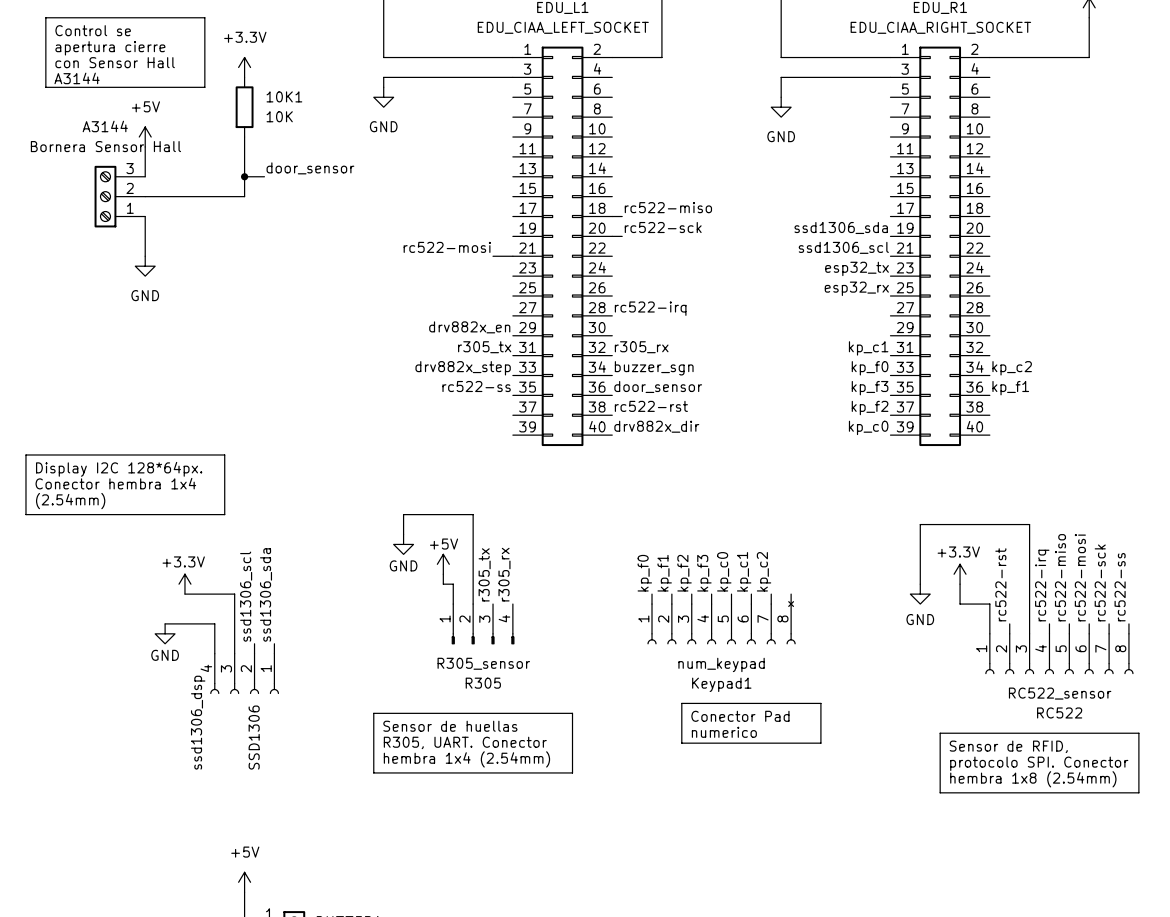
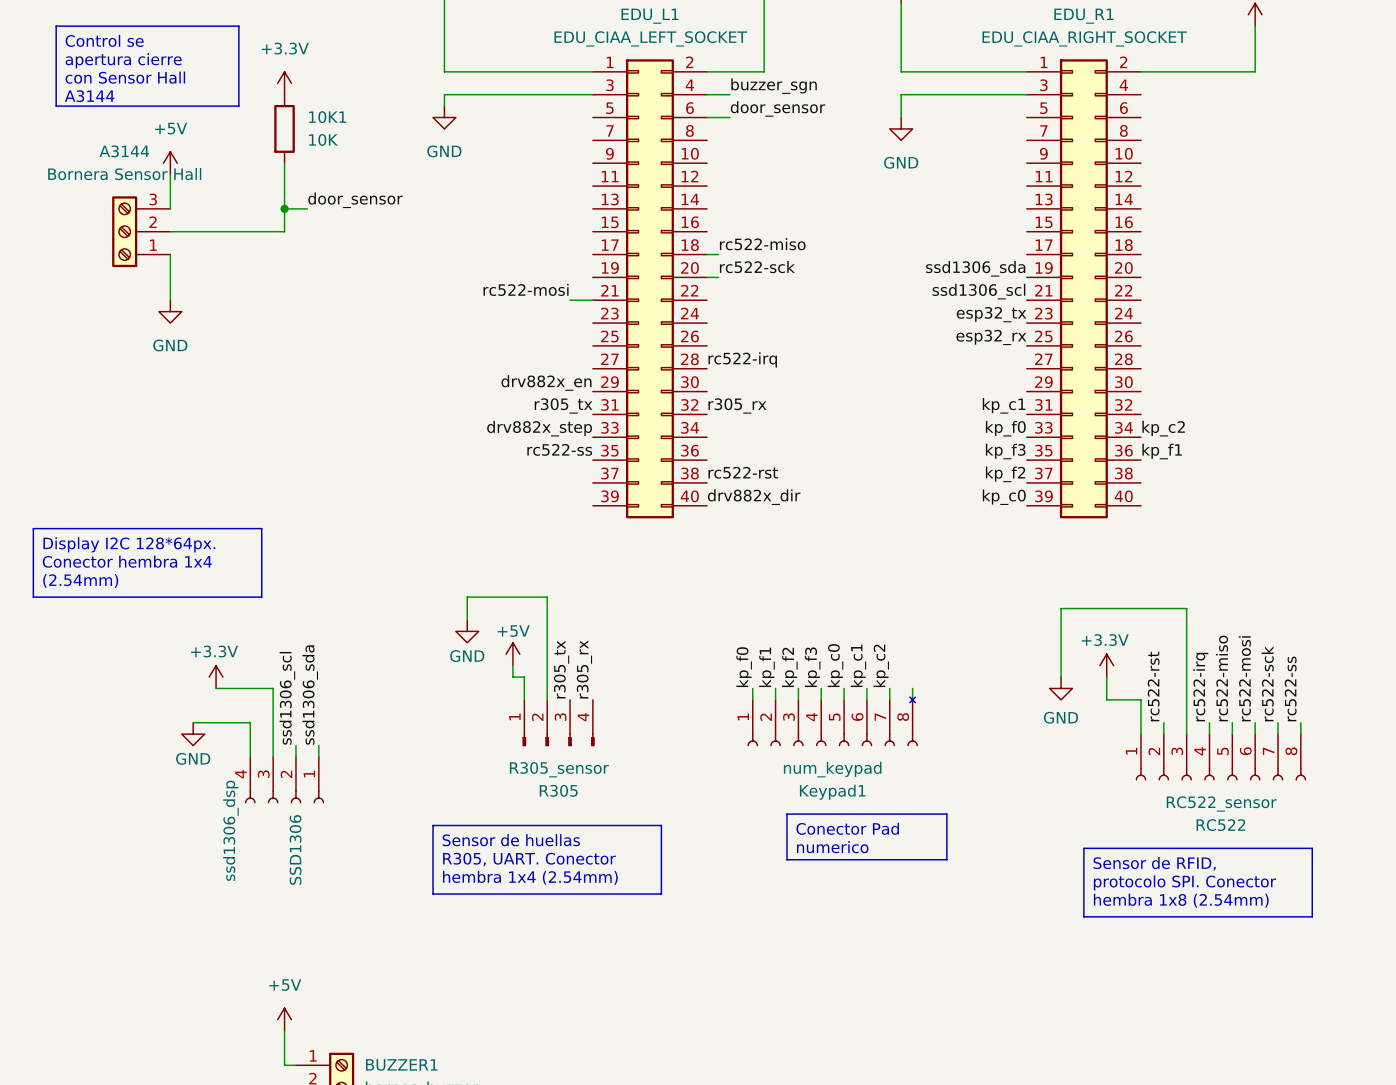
label: none -> buzzer_sgn (774, 86)
wire: none -> (707, 94) (729, 94)
label: none -> door_sensor (777, 108)
wire: none -> (707, 117) (729, 117)
label: buzzer_sgn (654, 368) -> none
label: door_sensor (658, 386) -> none

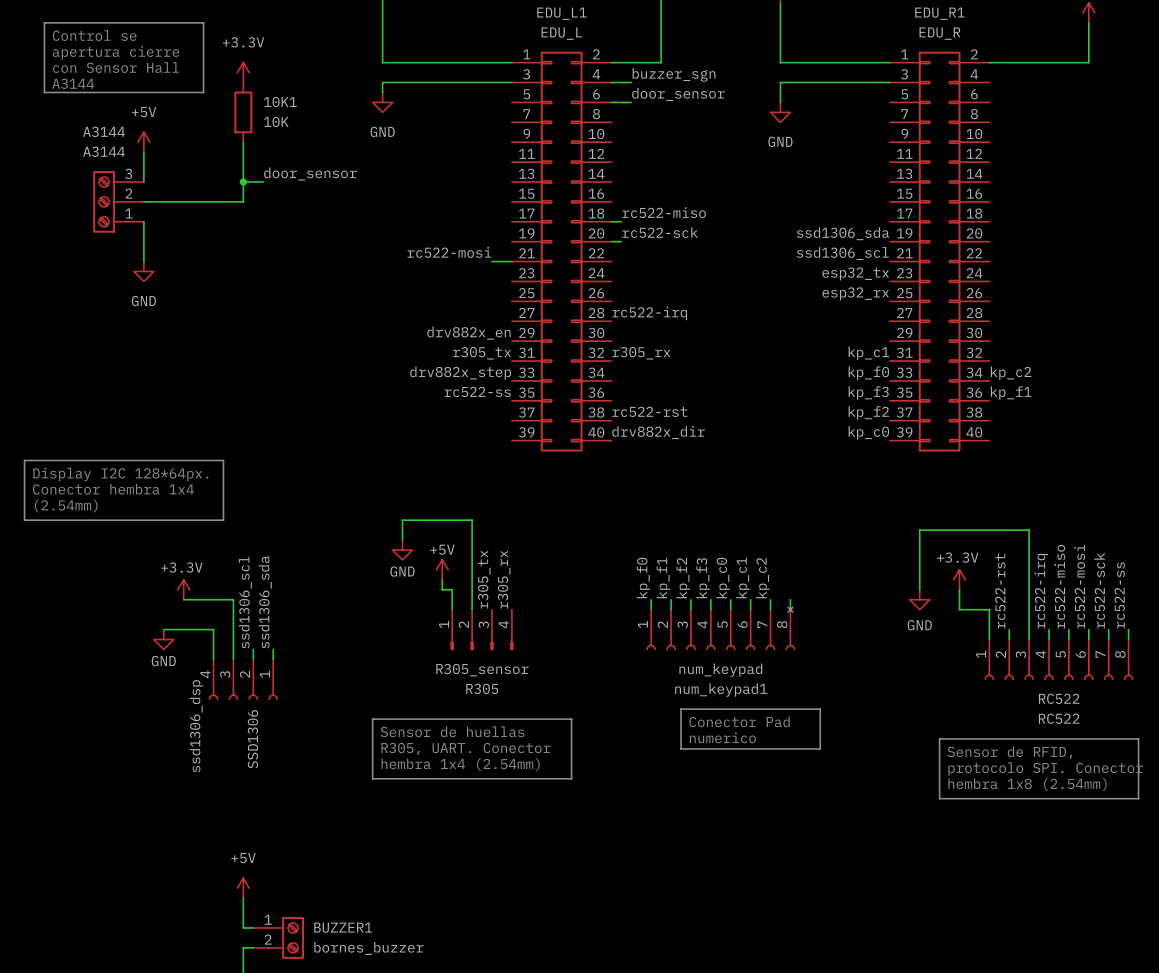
EDU_L1 value: EDU_CIAA_LEFT_SOCKET (650, 38) -> EDU_L (561, 33)
EDU_R1 value: EDU_CIAA_RIGHT_SOCKET (1084, 38) -> EDU_R (939, 33)
A3144 value: Bornera Sensor Hall (124, 174) -> A3144 (104, 151)
Keypad1 name: Keypad1 (832, 792) -> num_keypad1 (721, 690)
RC522 value: RC522_sensor (1221, 803) -> RC522 (1059, 698)

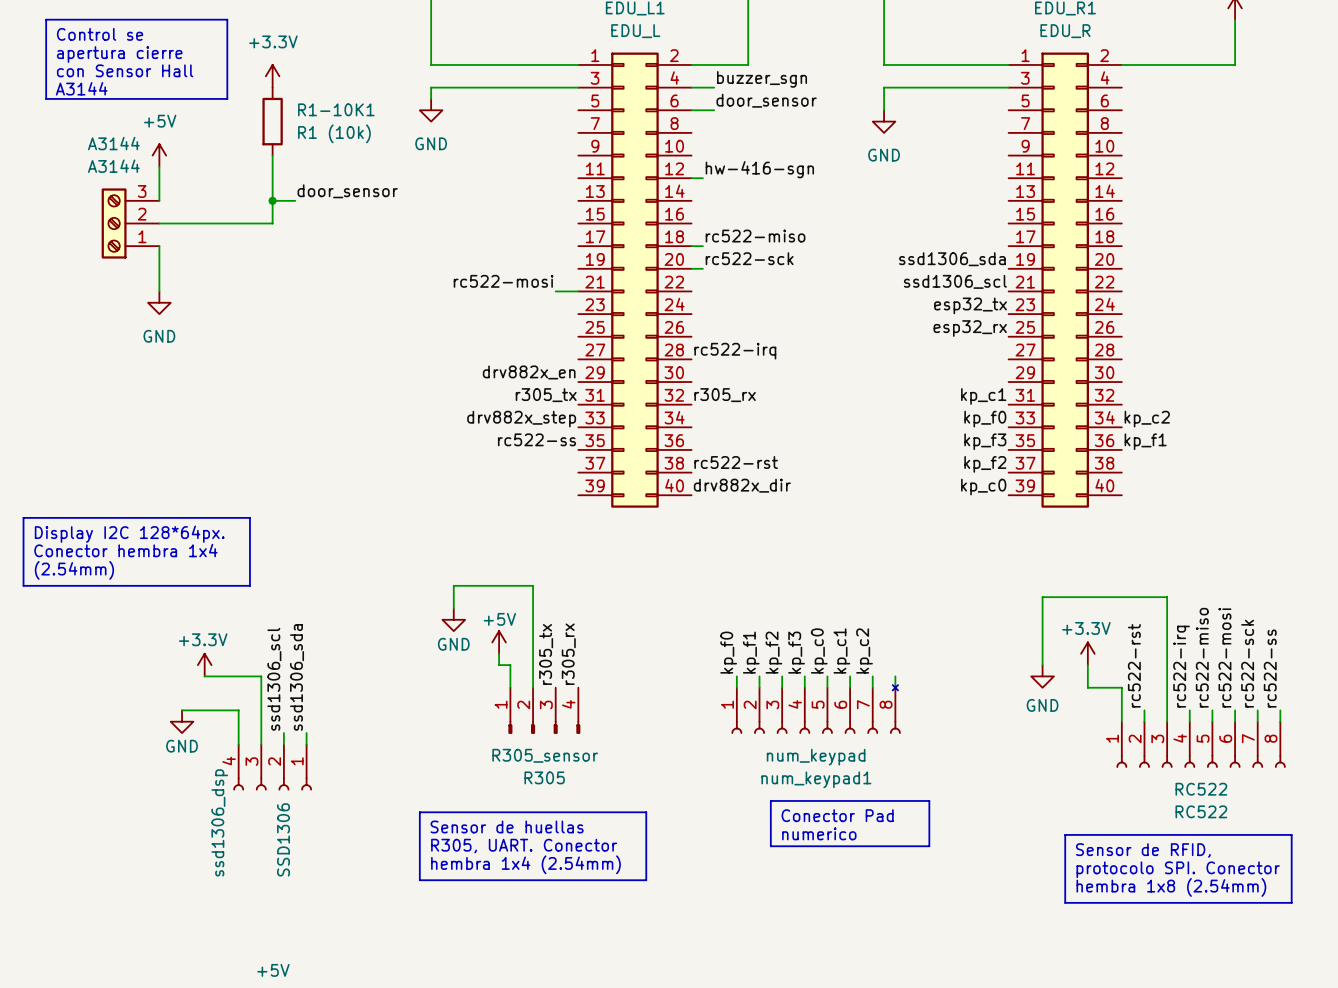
10K1 name: 10K1 (280, 102) -> R1-10K1 (336, 109)
10K1 value: 10K (276, 121) -> R1 (10k) (334, 133)
label: none -> hw-416-sgn (759, 169)
wire: none -> (691, 178) (702, 178)

